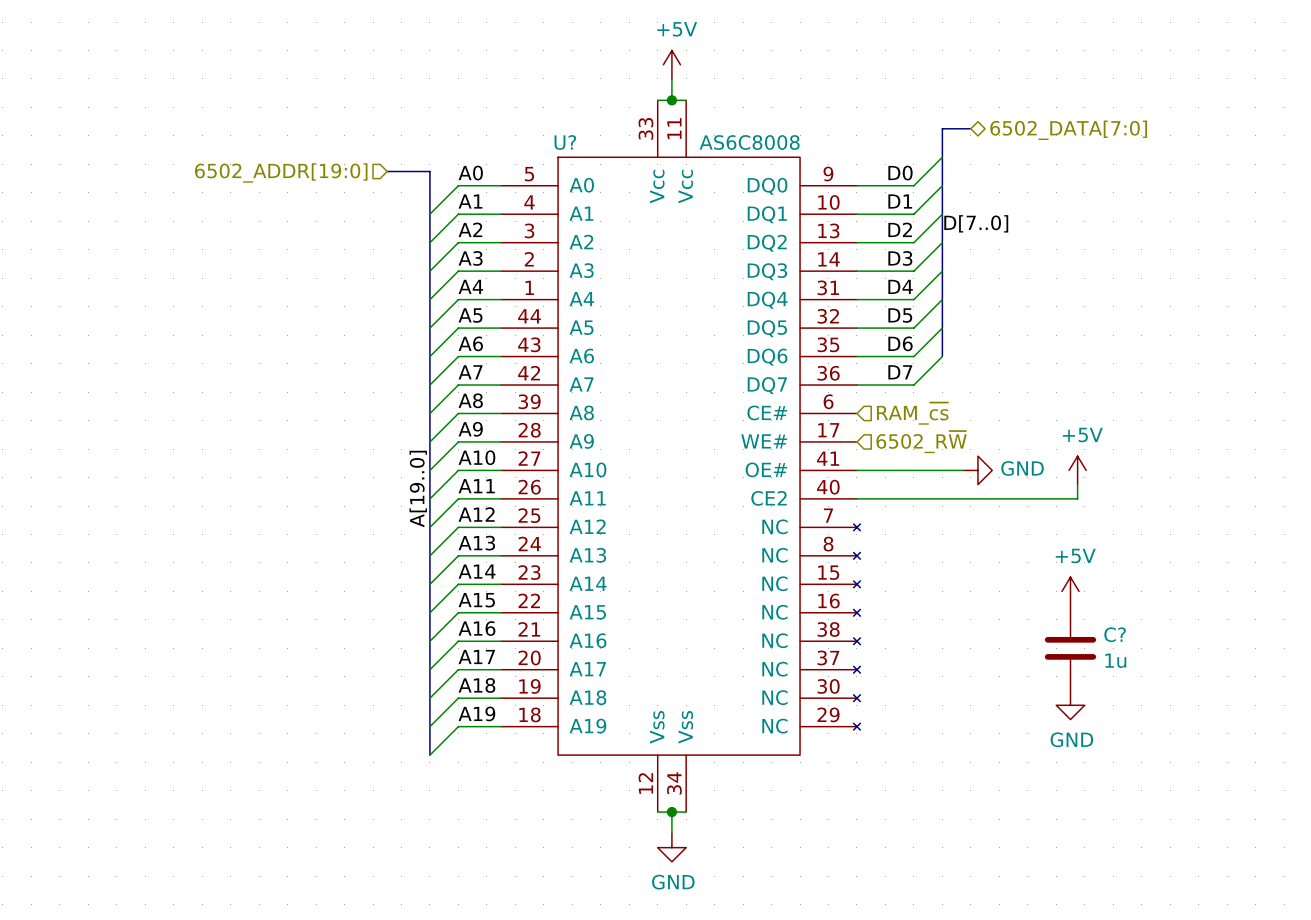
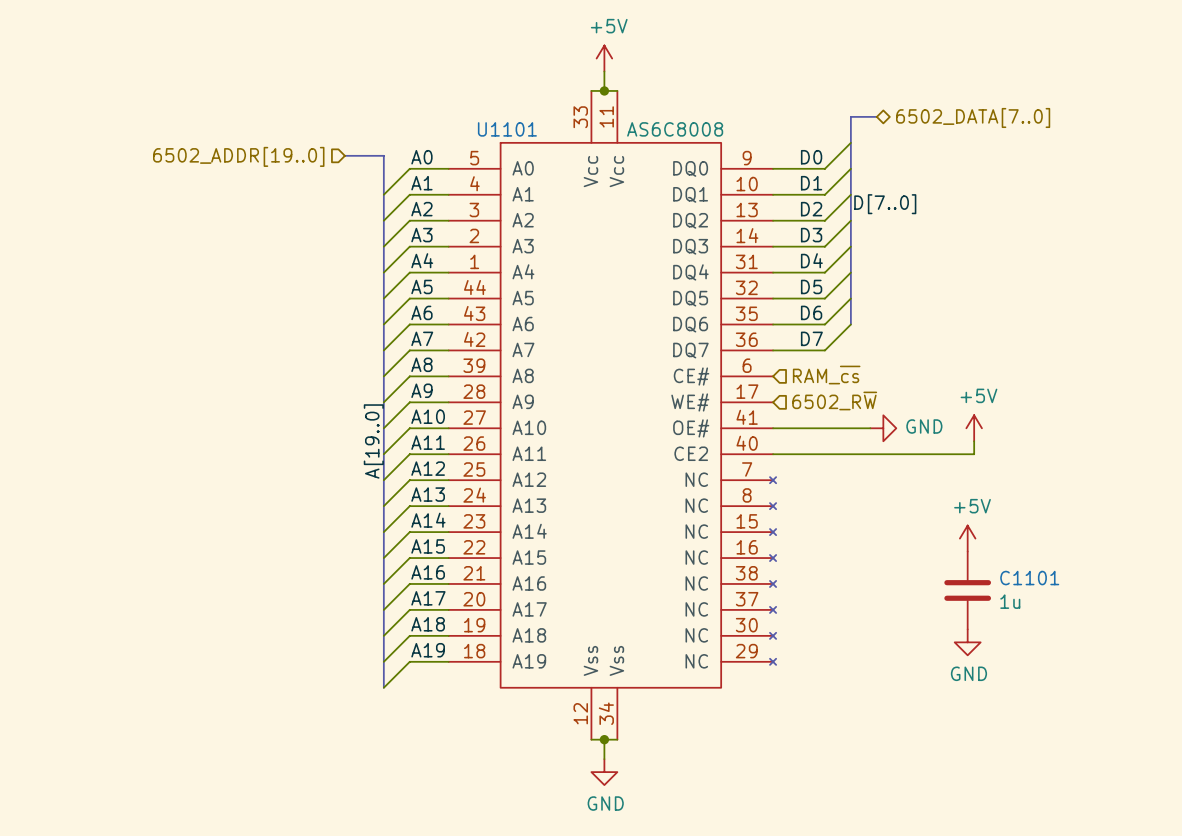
hierarchical label: 6502_DATA[7:0] (1068, 130) -> 6502_DATA[7..0] (973, 117)
U? name: U? (565, 142) -> U1101 (507, 129)
hierarchical label: 6502_ADDR[19:0] (281, 172) -> 6502_ADDR[19..0] (238, 156)
C? name: C? (1115, 634) -> C1101 (1029, 578)

